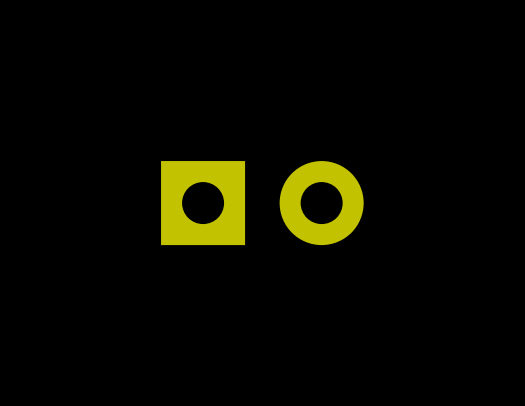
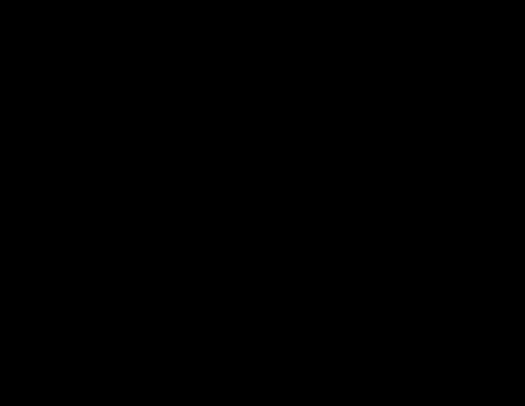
part: (262, 203) -> none

